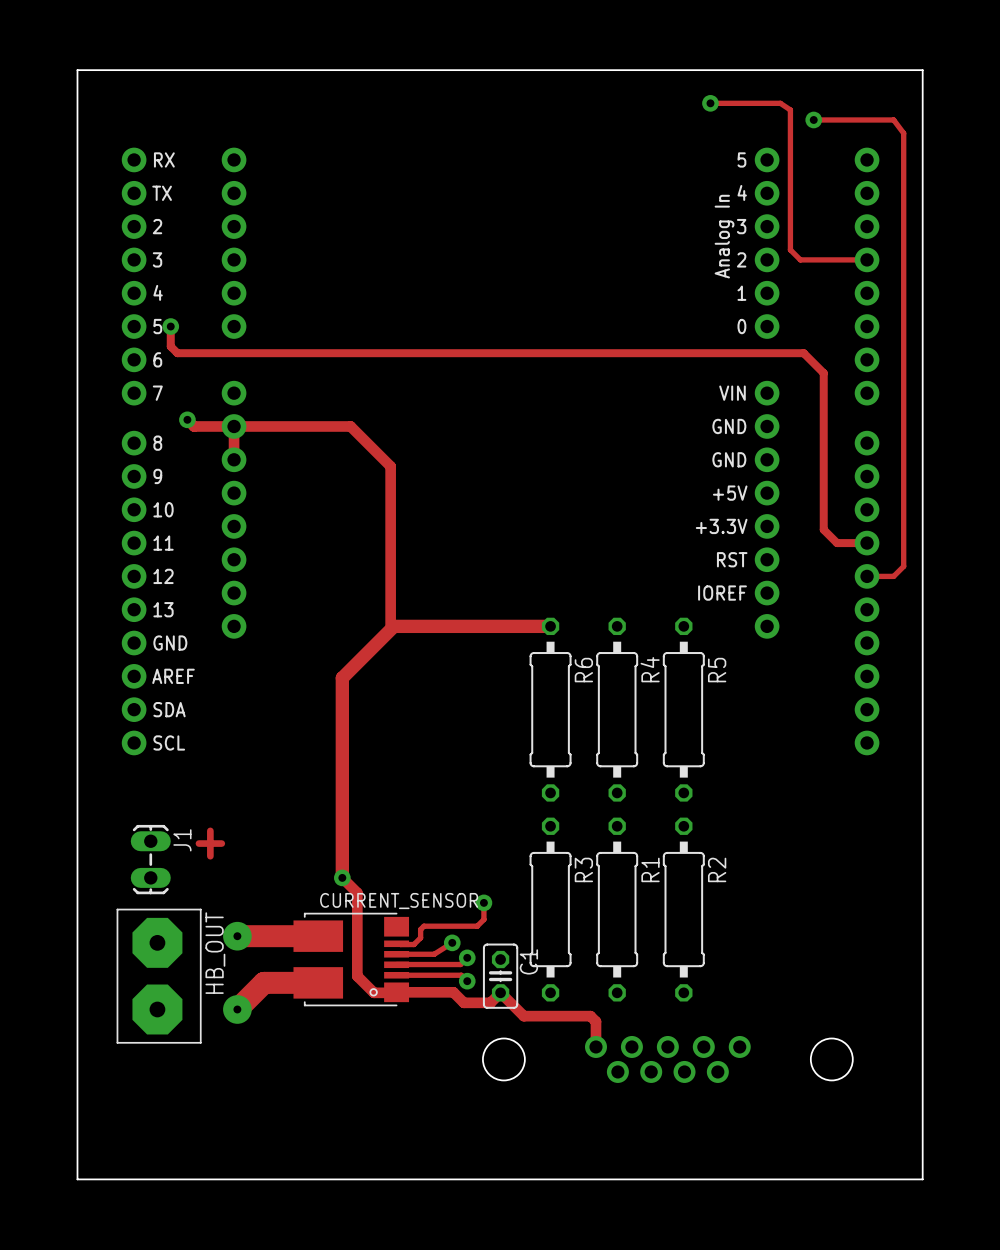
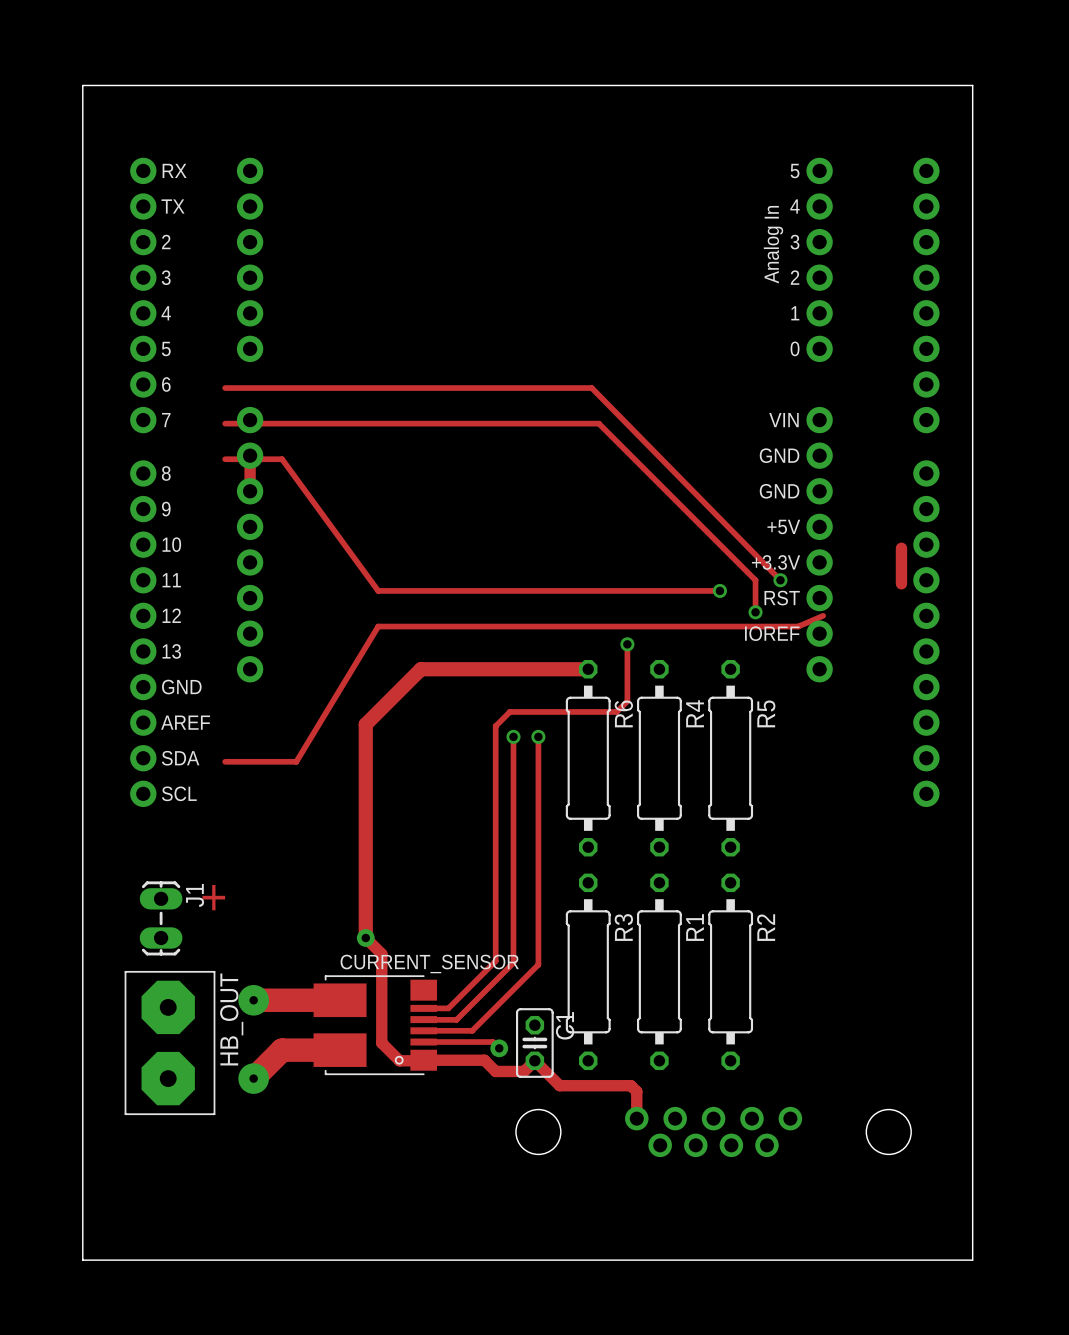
board edge: (77, 80) (77, 70) (922, 70) (922, 1179) (910, 1179) -> (82, 85) (972, 85) (972, 1260)
track: (710, 103) (780, 103) (790, 109) (790, 249) (800, 259) (867, 259) -> none
via: (710, 103) -> none
track: (813, 119) (893, 119) (903, 133) (903, 566) (893, 576) (867, 576) -> none
via: (813, 119) -> none
track: (170, 326) (170, 346) (177, 353) (803, 353) (823, 373) (823, 529) (837, 543) (867, 543) -> none
via: (170, 326) -> none
track: none -> (225, 388) (591, 388) (780, 580)
track: none -> (225, 423) (598, 423) (755, 580) (755, 612)
track: (187, 419) (194, 426) (350, 426) (390, 466) (390, 626) -> none
via: (187, 419) -> none
track: none -> (225, 459) (282, 459) (378, 590) (719, 590)
track: none -> (901, 548) (901, 583)
via: none -> (780, 580)
via: none -> (719, 590)
via: none -> (755, 612)
track: none -> (823, 615) (798, 626) (378, 626) (296, 761) (225, 761)
via: none -> (627, 644)
via: none -> (513, 736)
via: none -> (538, 736)
track: (483, 902) (483, 919) (477, 926) (423, 926) (420, 929) (420, 937) (413, 944) (399, 943) -> (627, 644) (627, 701) (616, 711) (509, 711) (495, 726) (495, 961) (448, 1008) (427, 1008)
via: (483, 902) -> none
track: (452, 942) (434, 954) (396, 954) -> (513, 736) (513, 962) (456, 1019) (423, 1019)
via: (452, 942) -> none
track: (467, 957) (460, 964) (396, 964) -> (538, 736) (538, 964) (472, 1030) (423, 1030)
via: (467, 957) -> none

